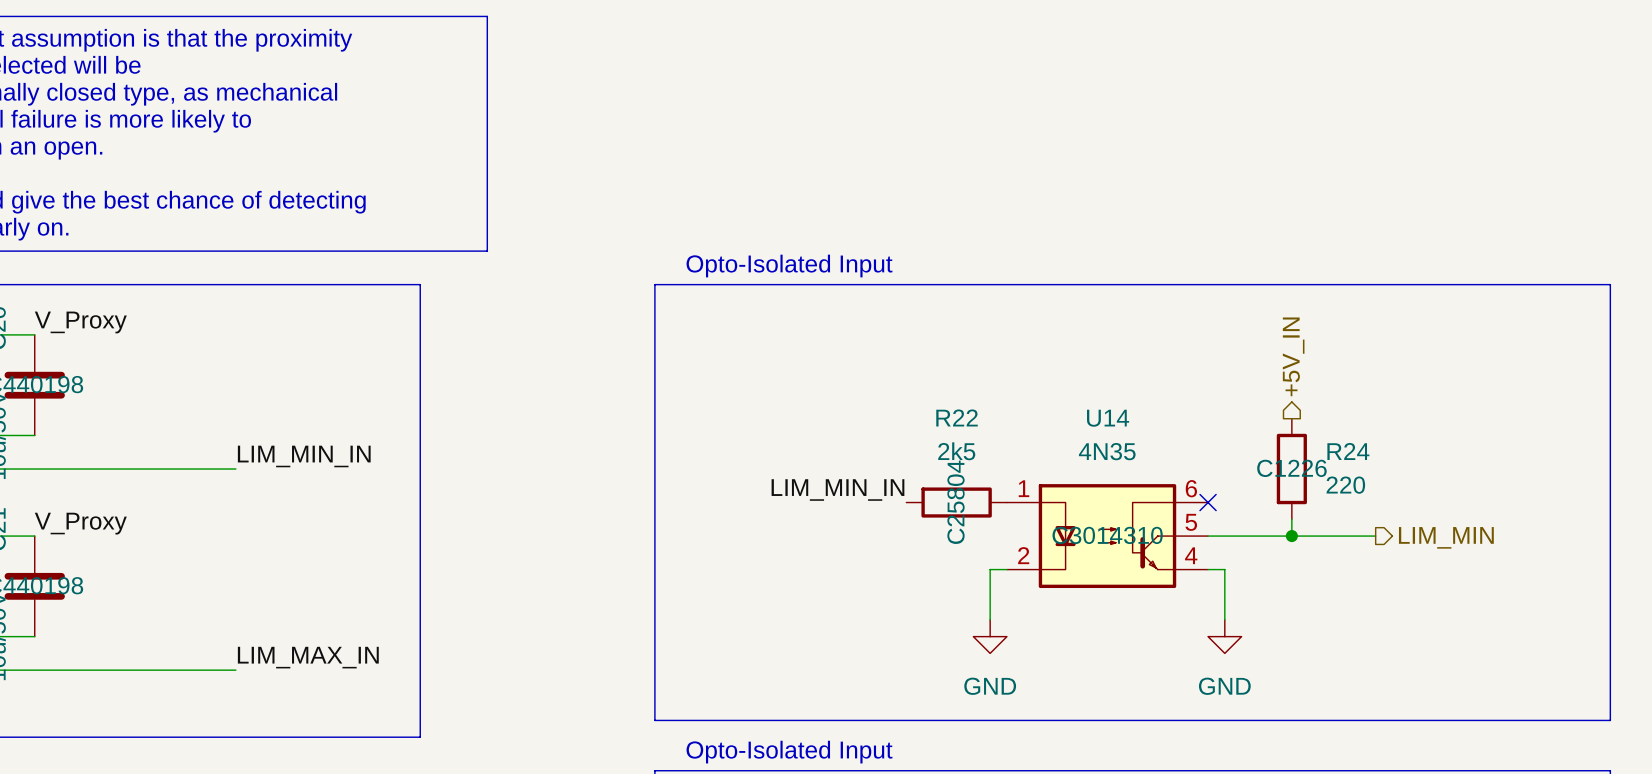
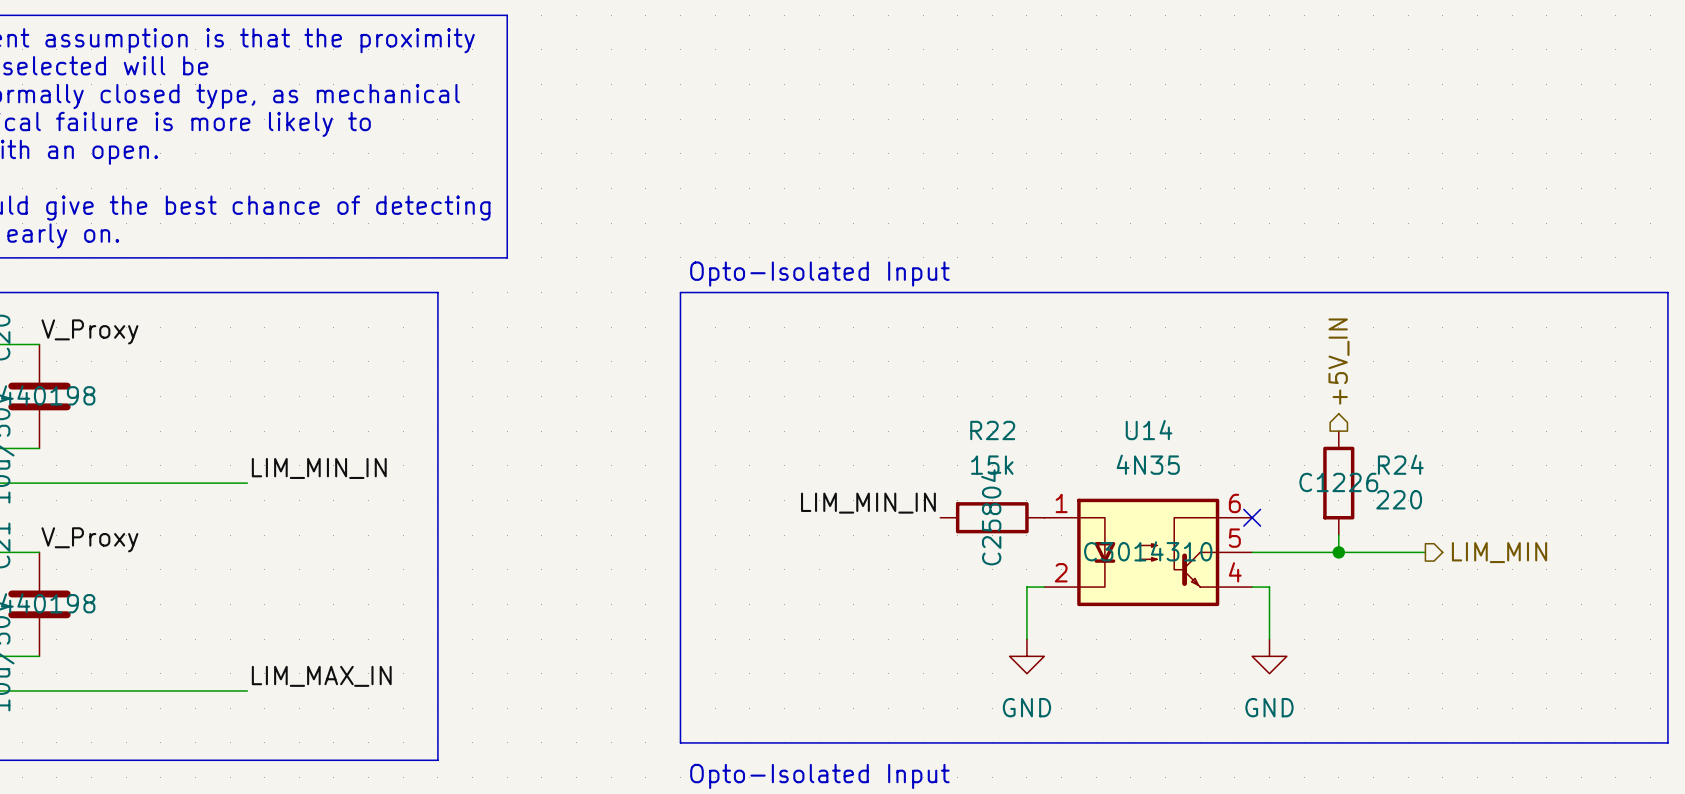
R22 value: 2k5 (956, 451) -> 15k (992, 465)

